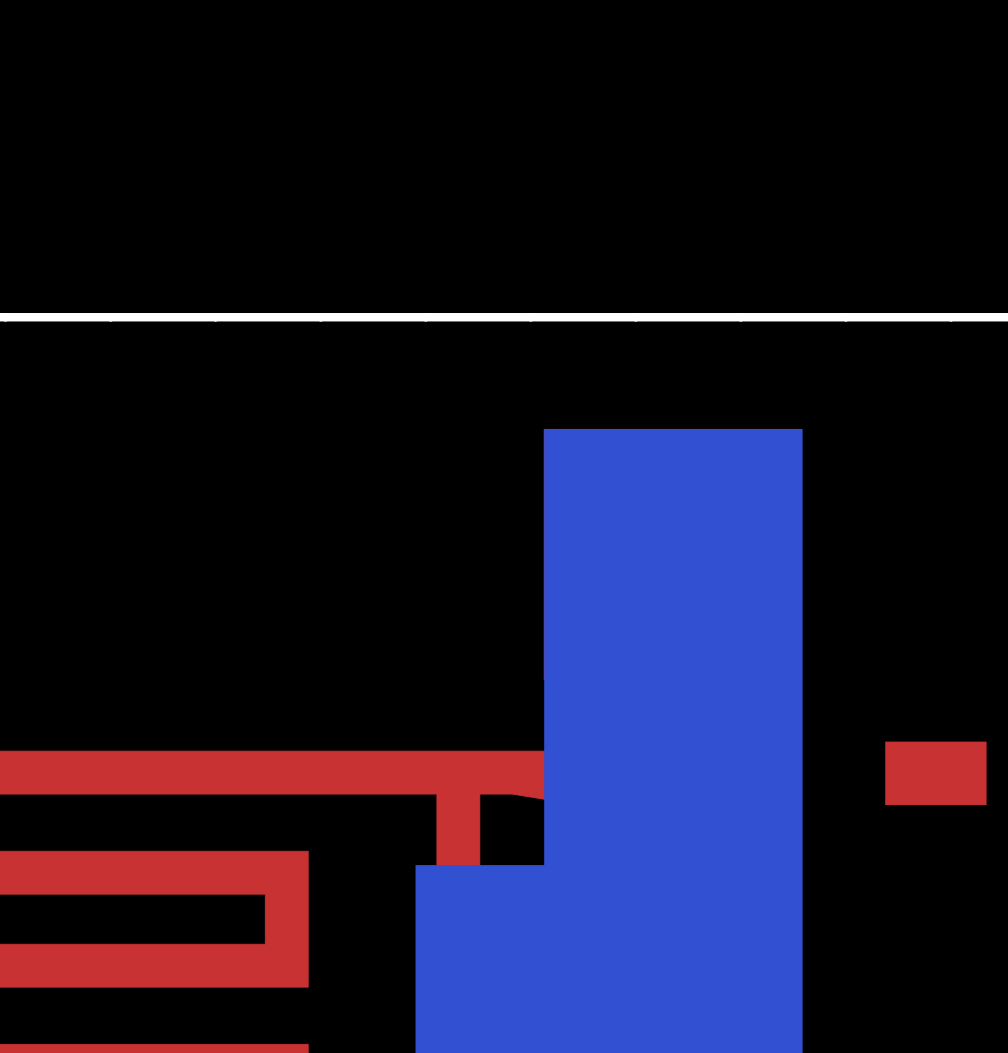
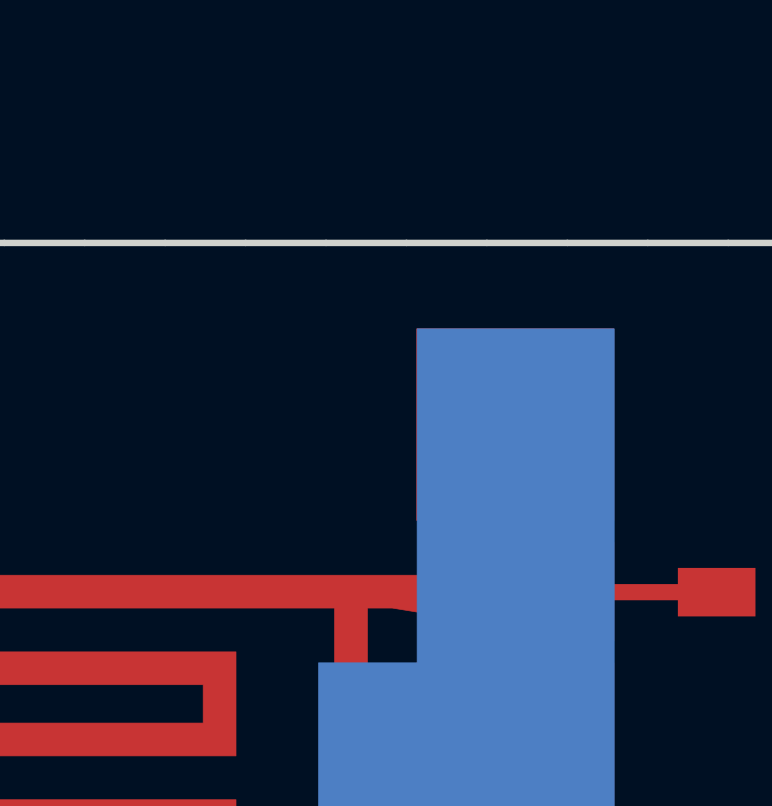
top track: none -> (716, 592) (577, 592)

